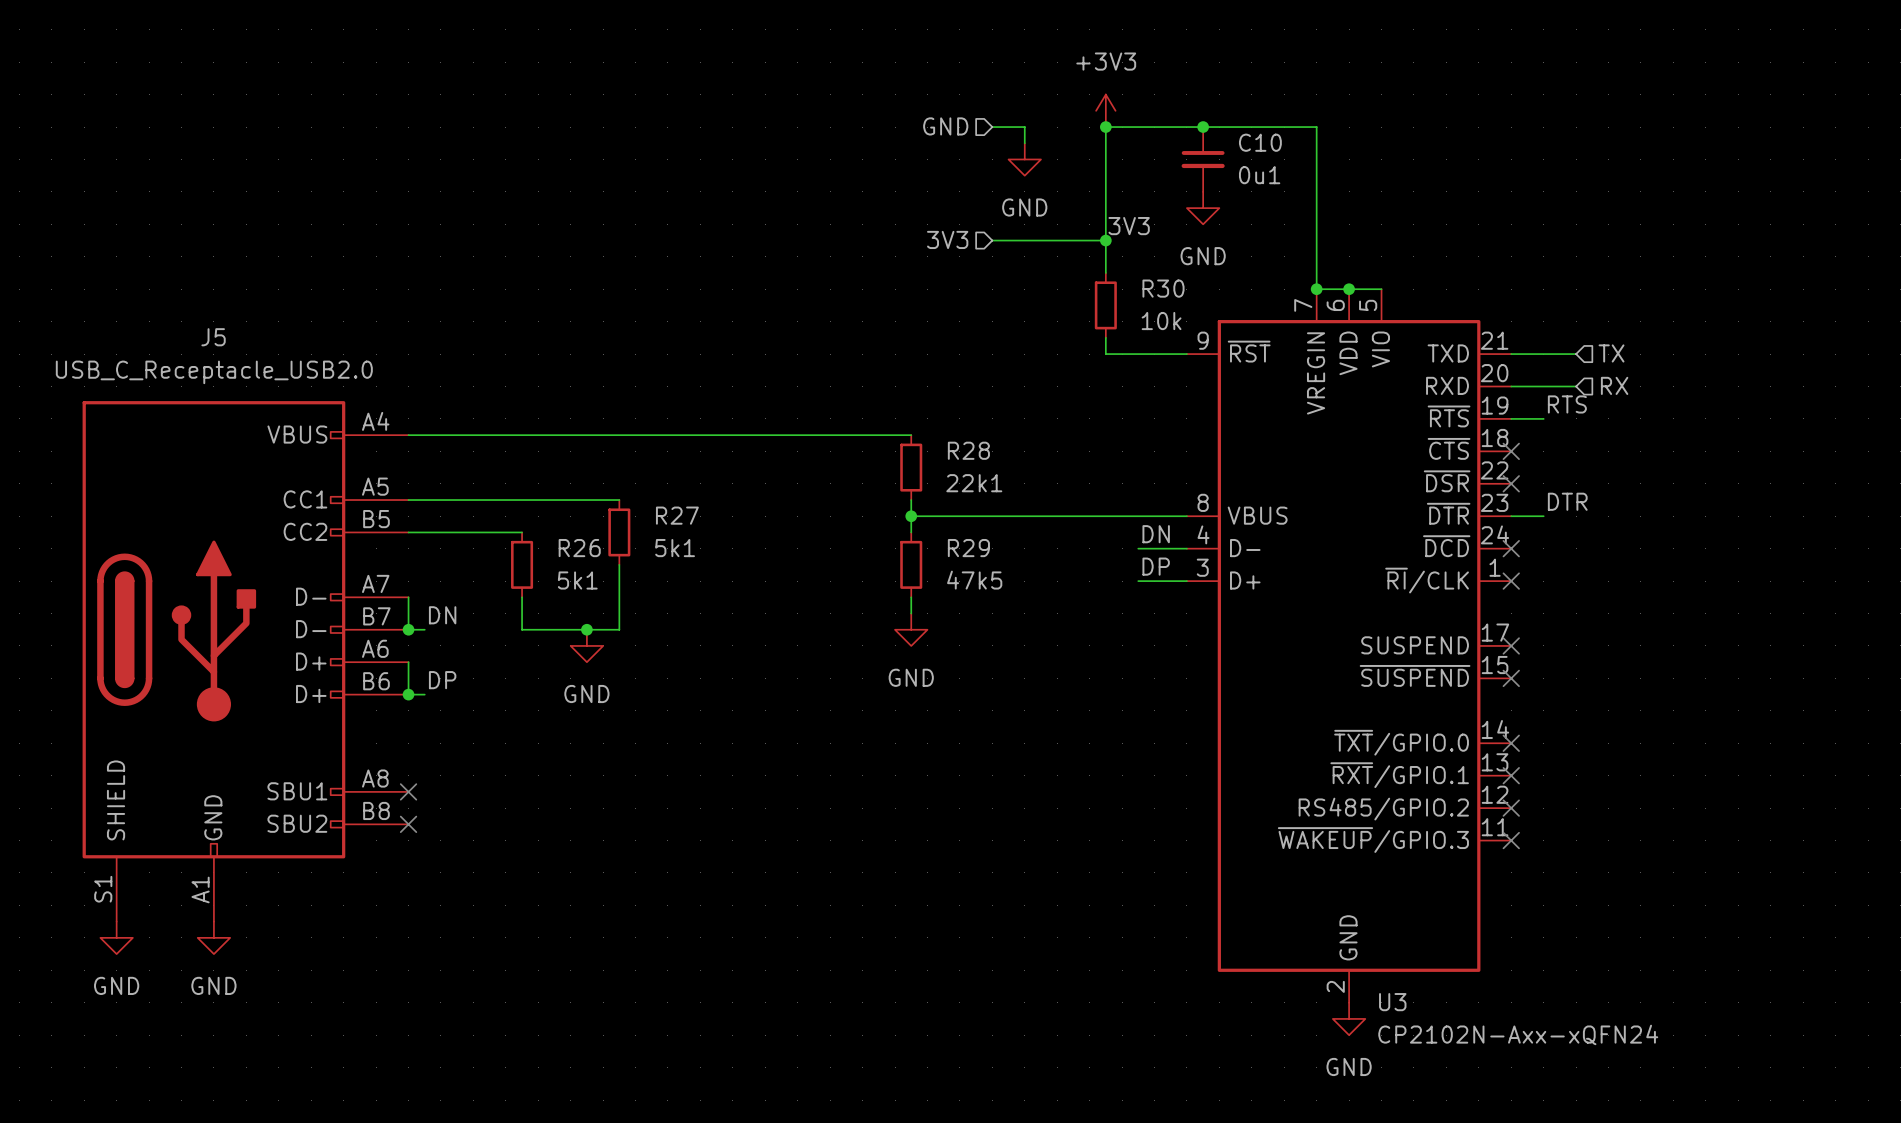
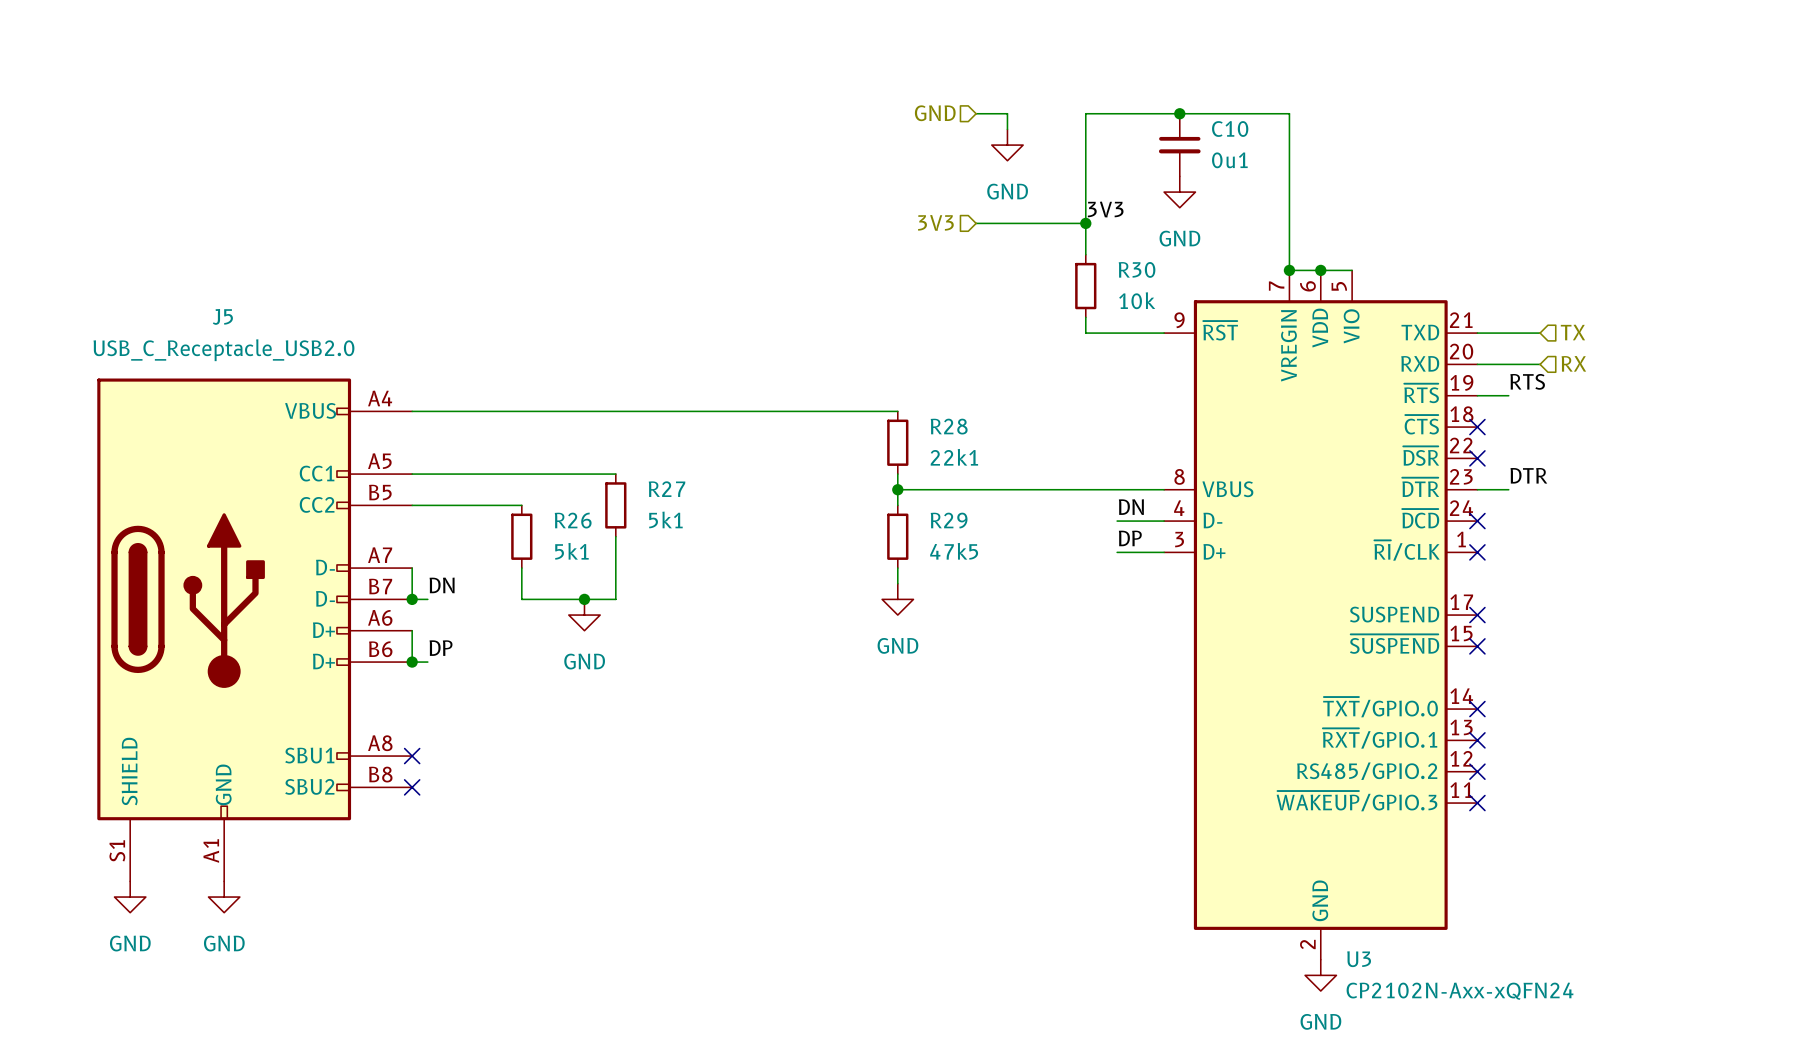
power symbol: +3V3 (1105, 110) -> none
junction: (1105, 127) -> none

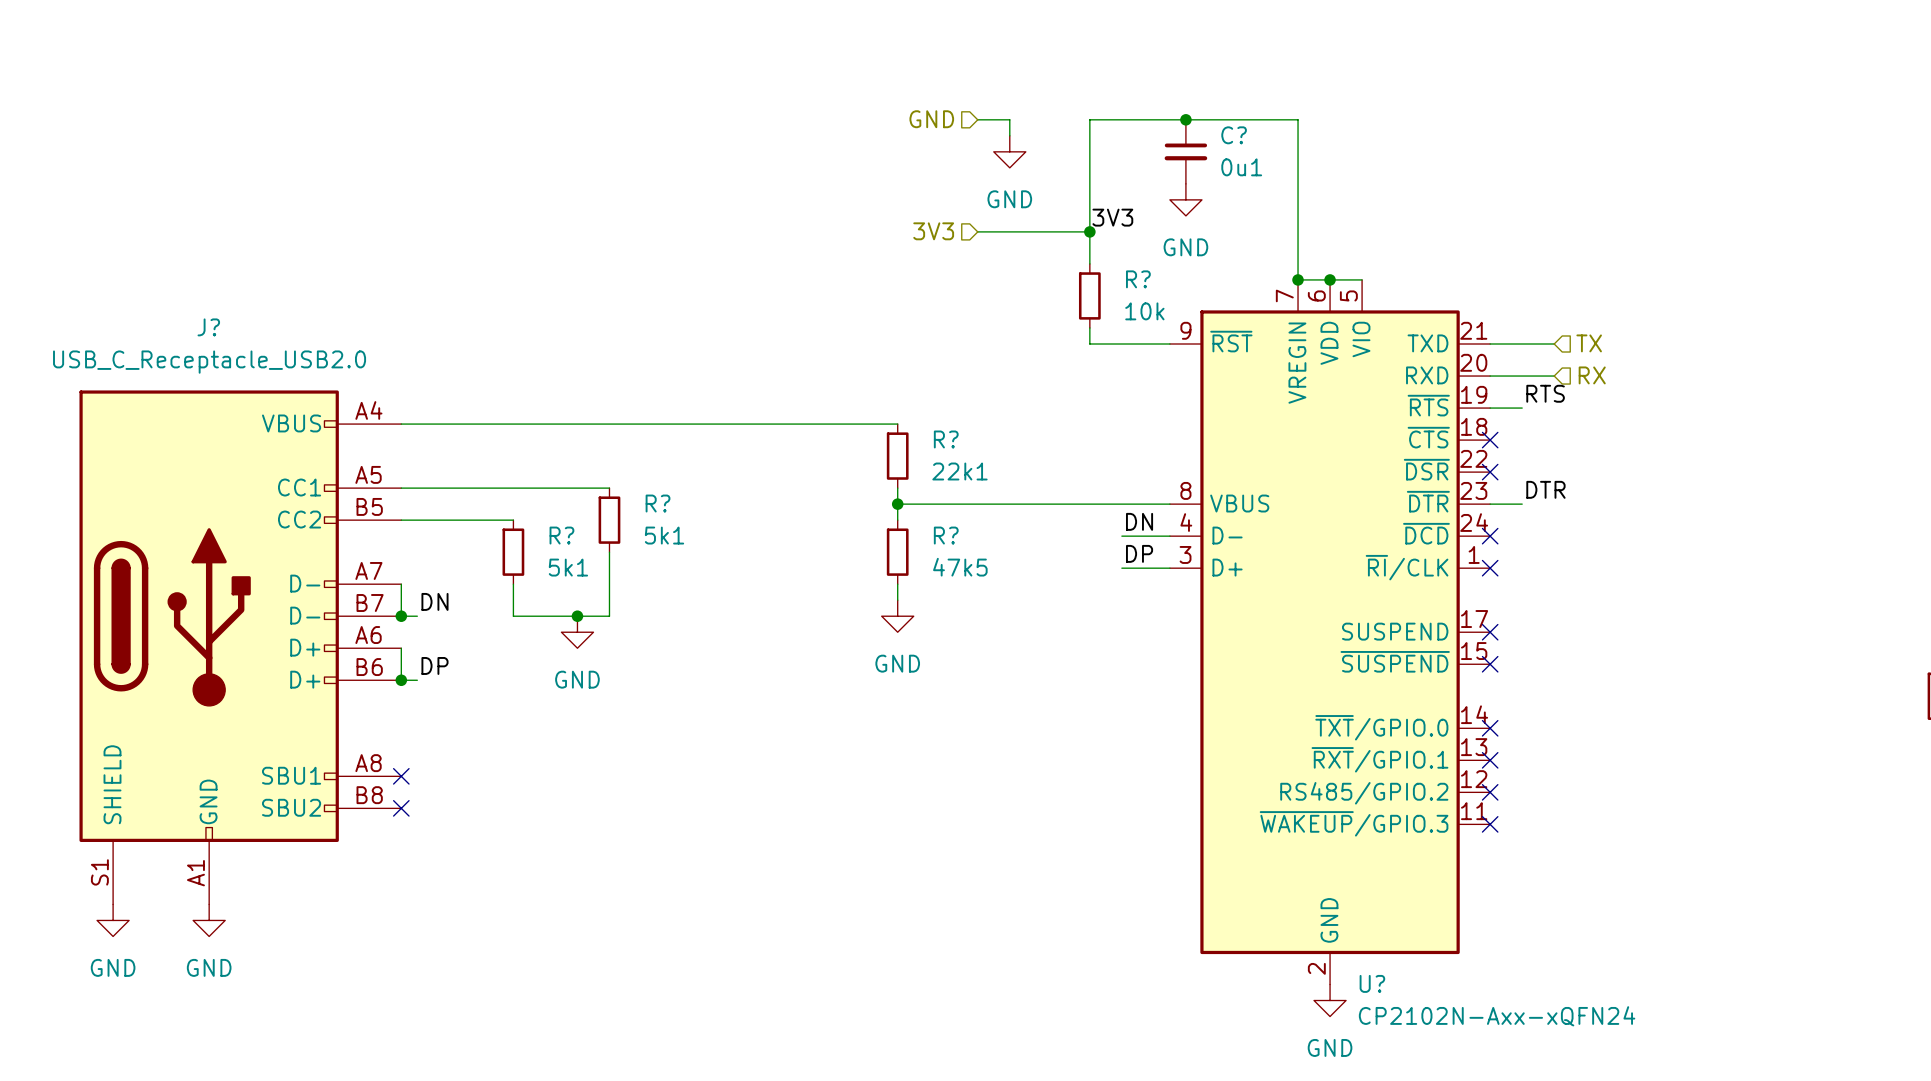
C10 name: C10 (1230, 128) -> C? (1234, 135)
R30 name: R30 (1137, 269) -> R? (1138, 279)
J5 name: J5 (222, 316) -> J? (208, 327)
R28 name: R28 (949, 426) -> R? (946, 439)
R27 name: R27 (667, 489) -> R? (658, 503)
R26 name: R26 (573, 520) -> R? (561, 535)
R29 name: R29 (949, 520) -> R? (946, 535)
U3 name: U3 (1359, 959) -> U? (1372, 983)

